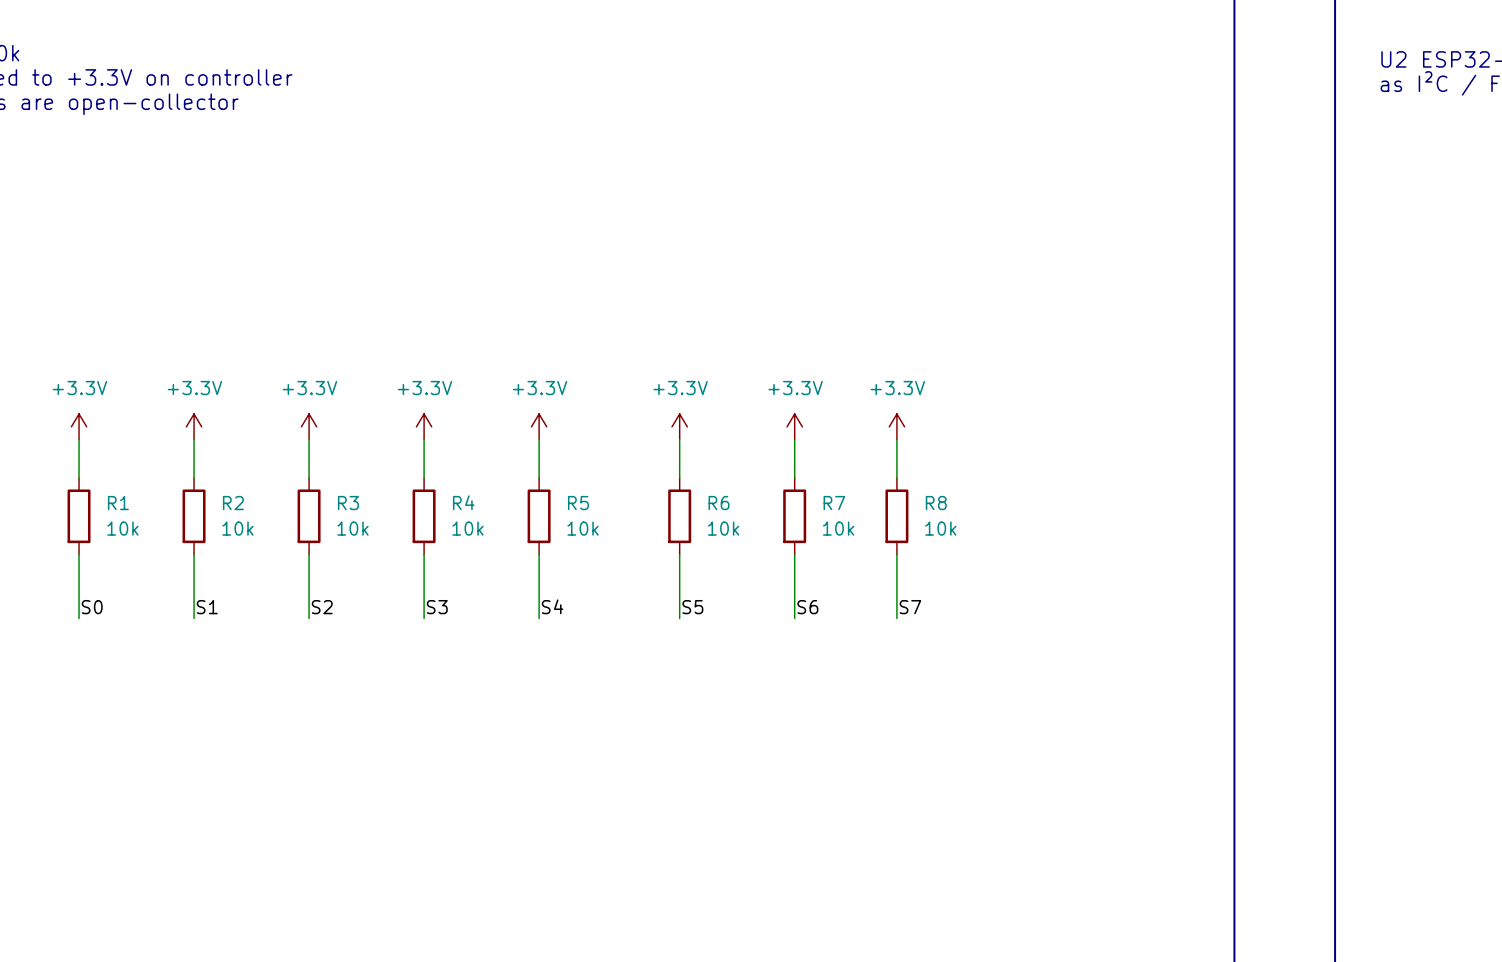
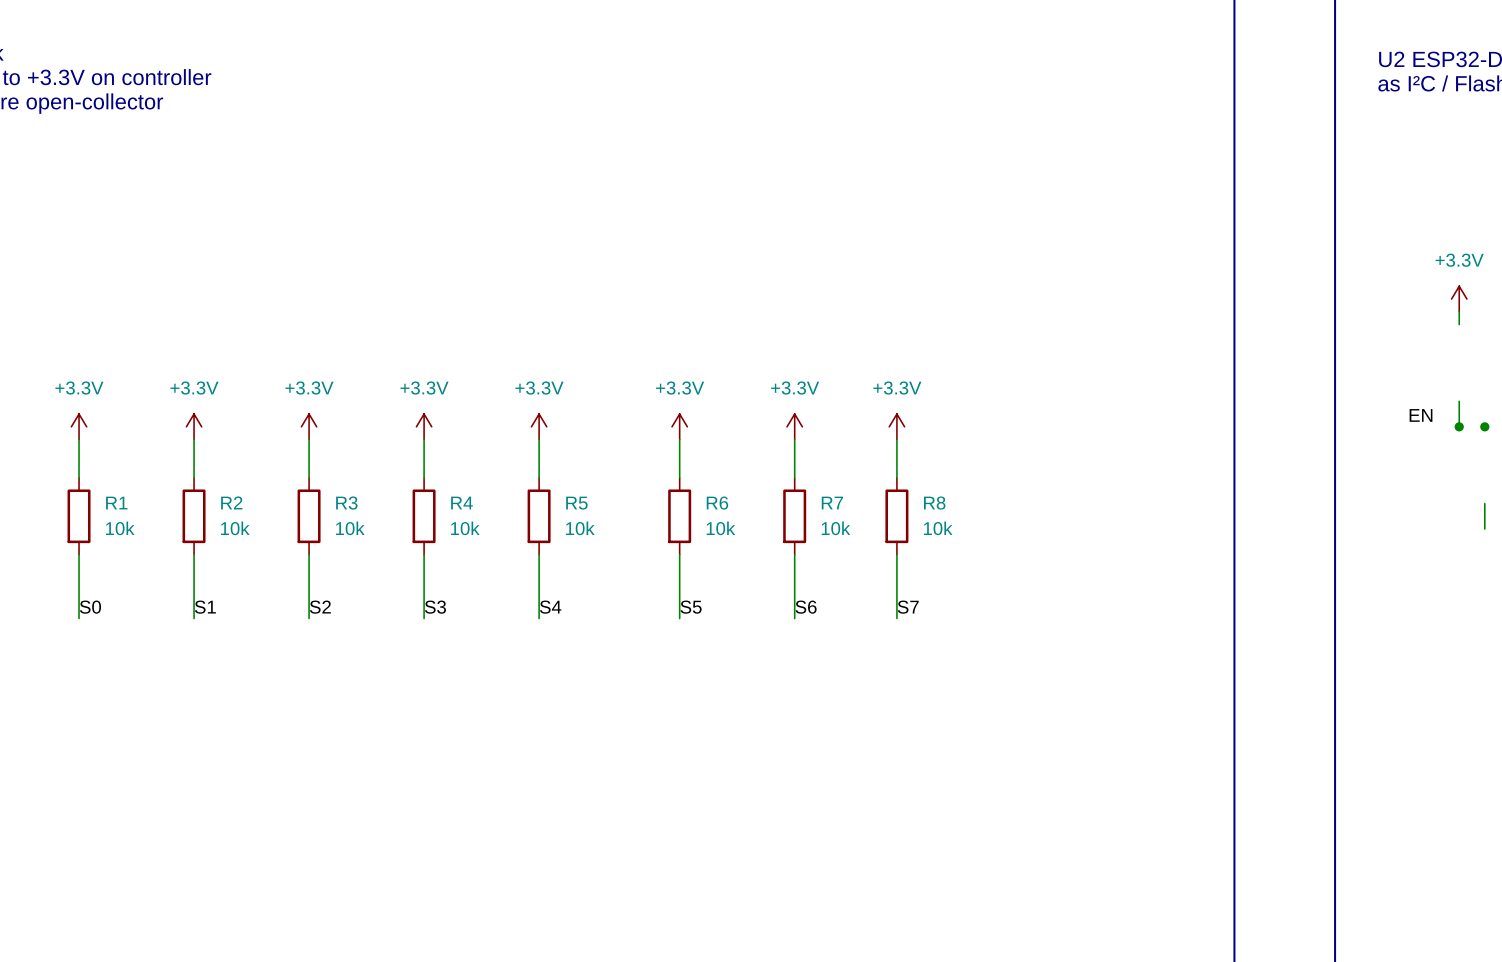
power symbol: none -> +3.3V (1459, 299)
wire: none -> (1459, 311) (1459, 324)
wire: none -> (1459, 401) (1459, 426)
label: none -> EN (1421, 415)
junction: none -> (1459, 426)
junction: none -> (1484, 426)
wire: none -> (1484, 503) (1484, 529)

